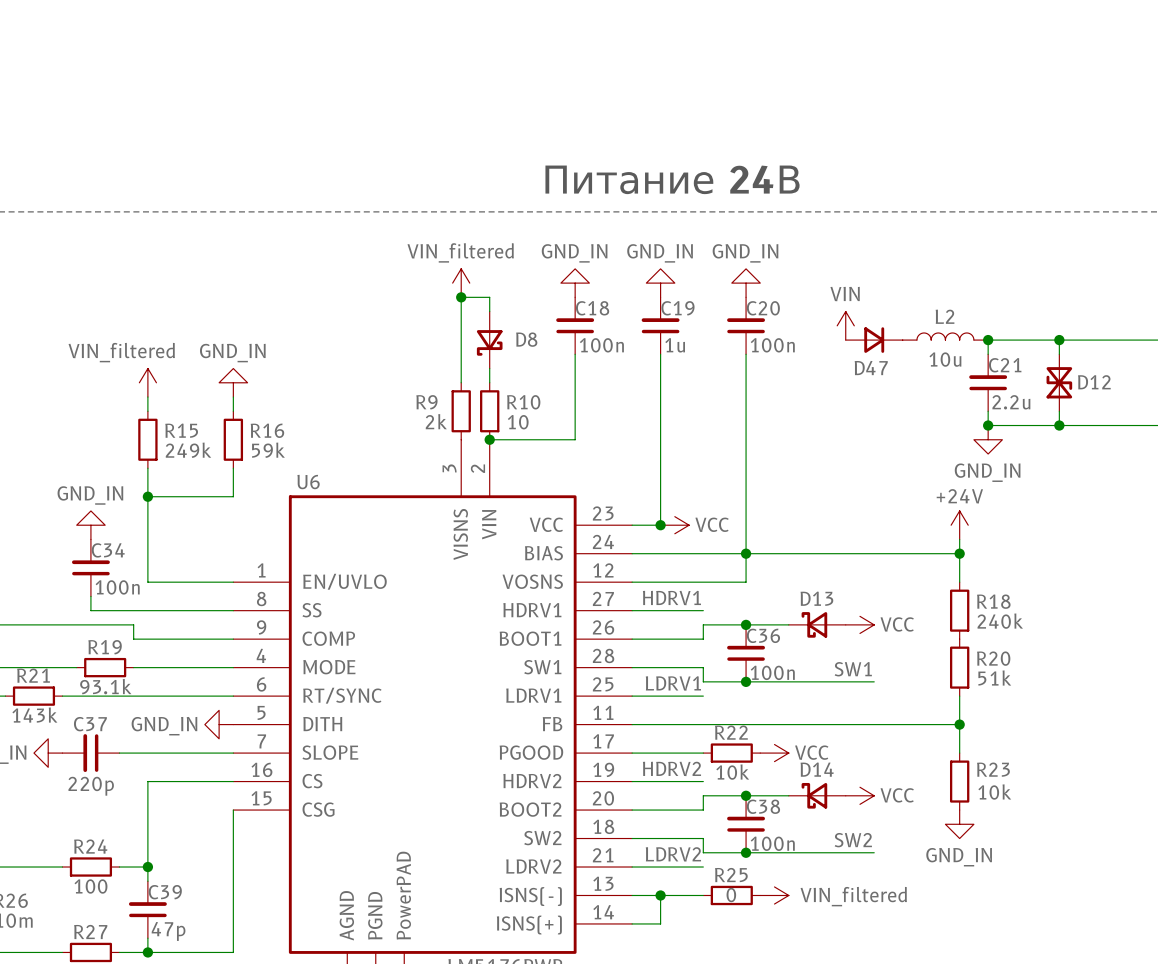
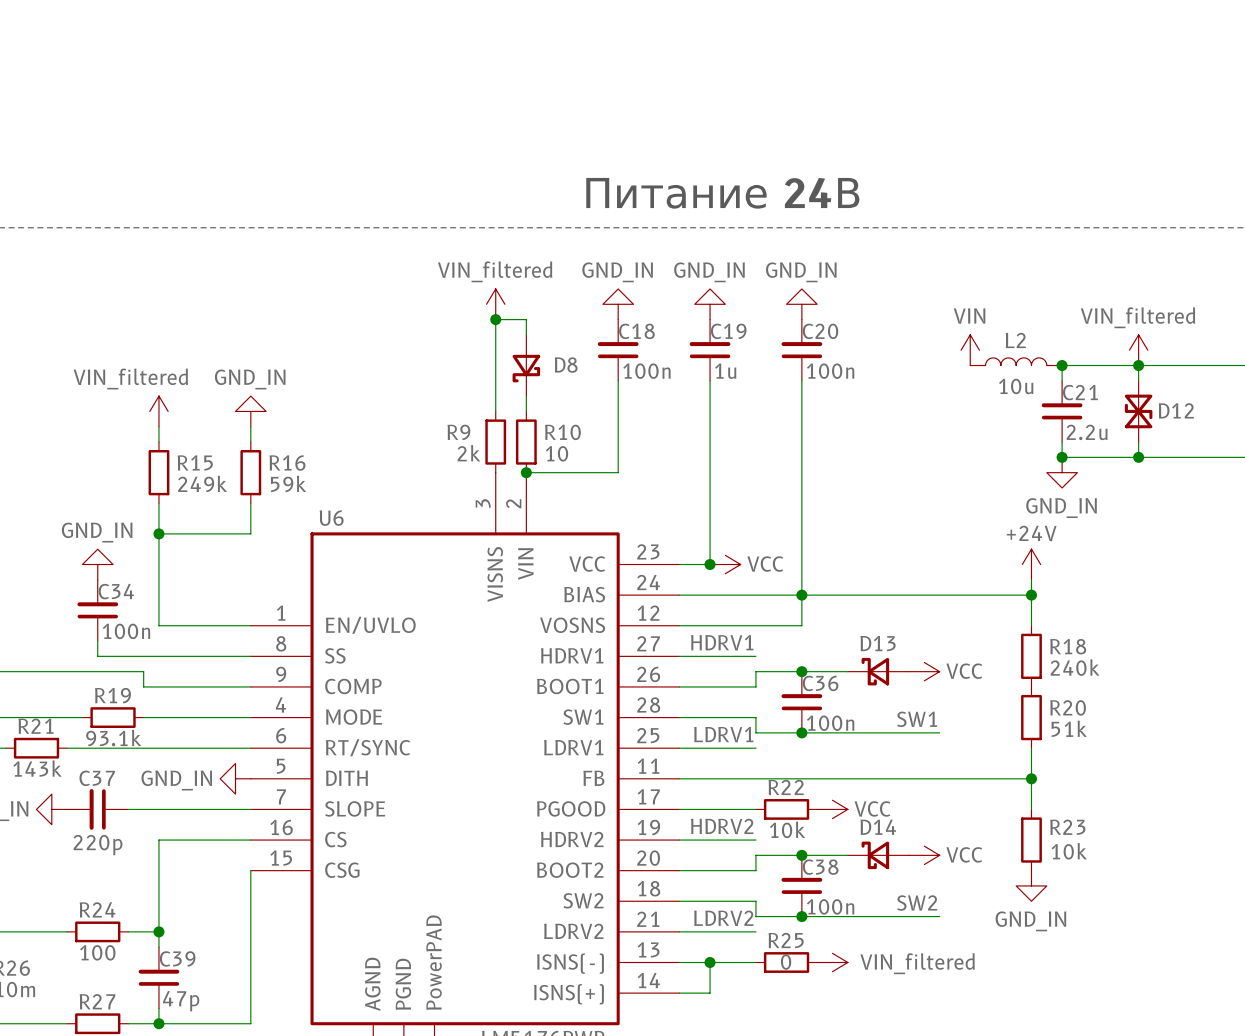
power symbol position: VIN (845, 325) -> VIN (970, 350)
power symbol: none -> VIN_filtered (1138, 350)
D47: (874, 340) -> none

